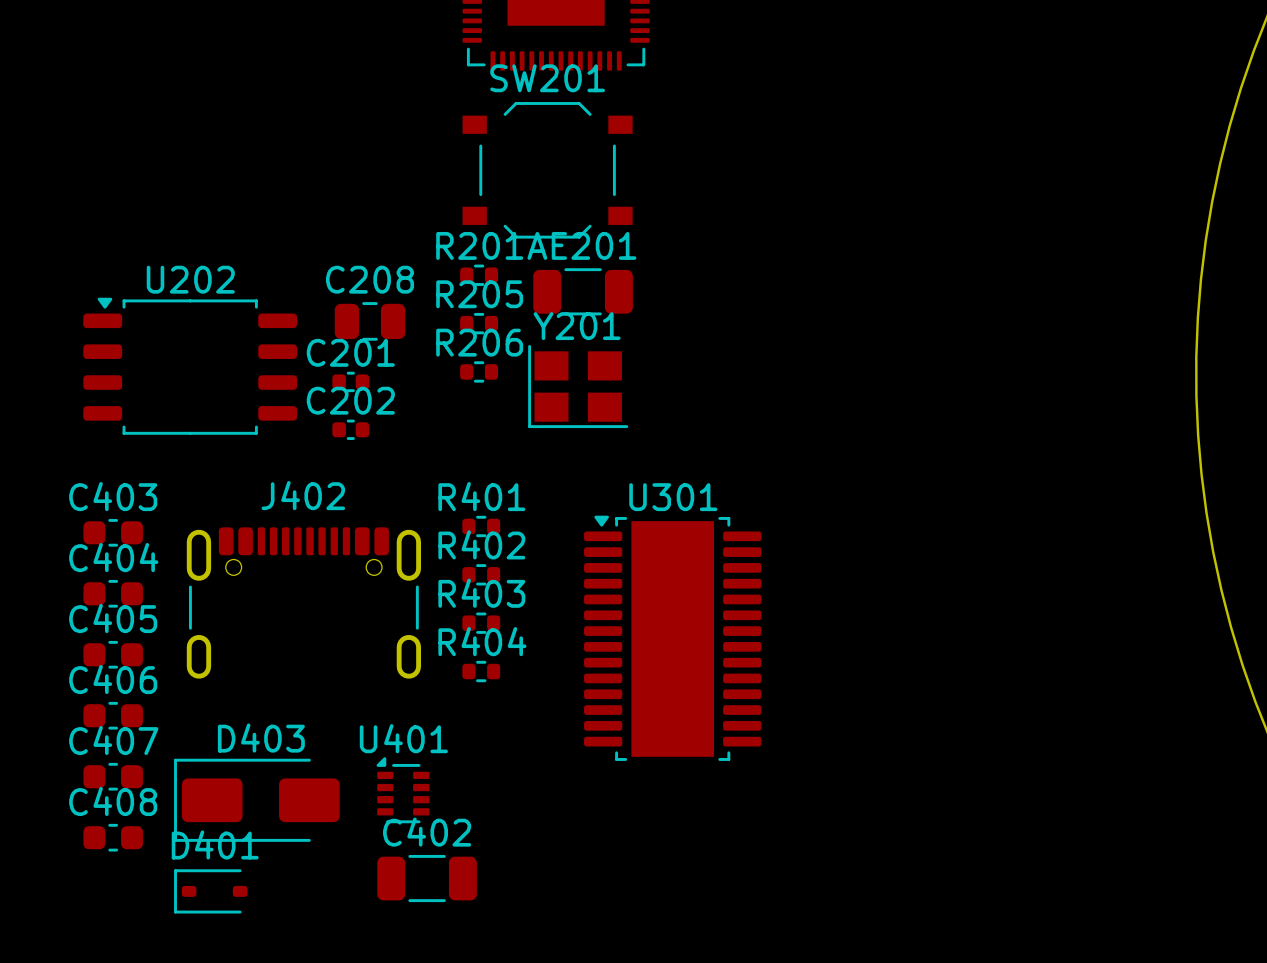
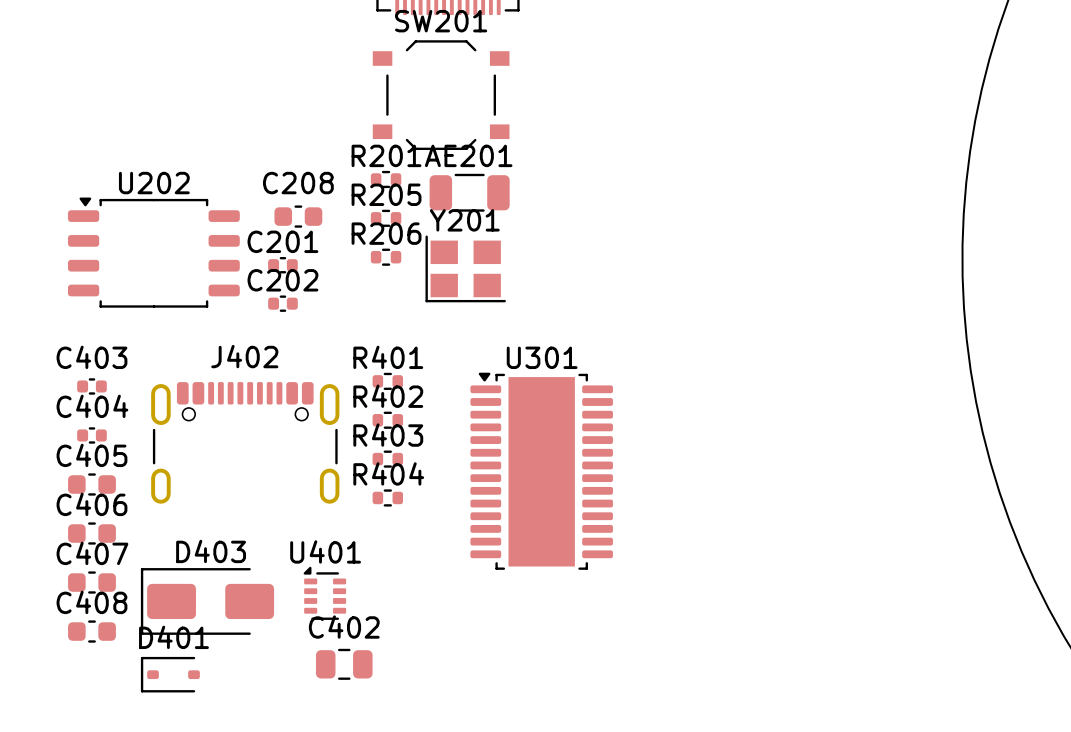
C208 footprint: [334, 302, 406, 341] -> [274, 205, 323, 228]
C403 footprint: [83, 518, 143, 547] -> [77, 378, 107, 395]
C404 footprint: [83, 579, 143, 608] -> [77, 427, 107, 444]
C402 footprint: [377, 854, 477, 903] -> [315, 648, 373, 680]

